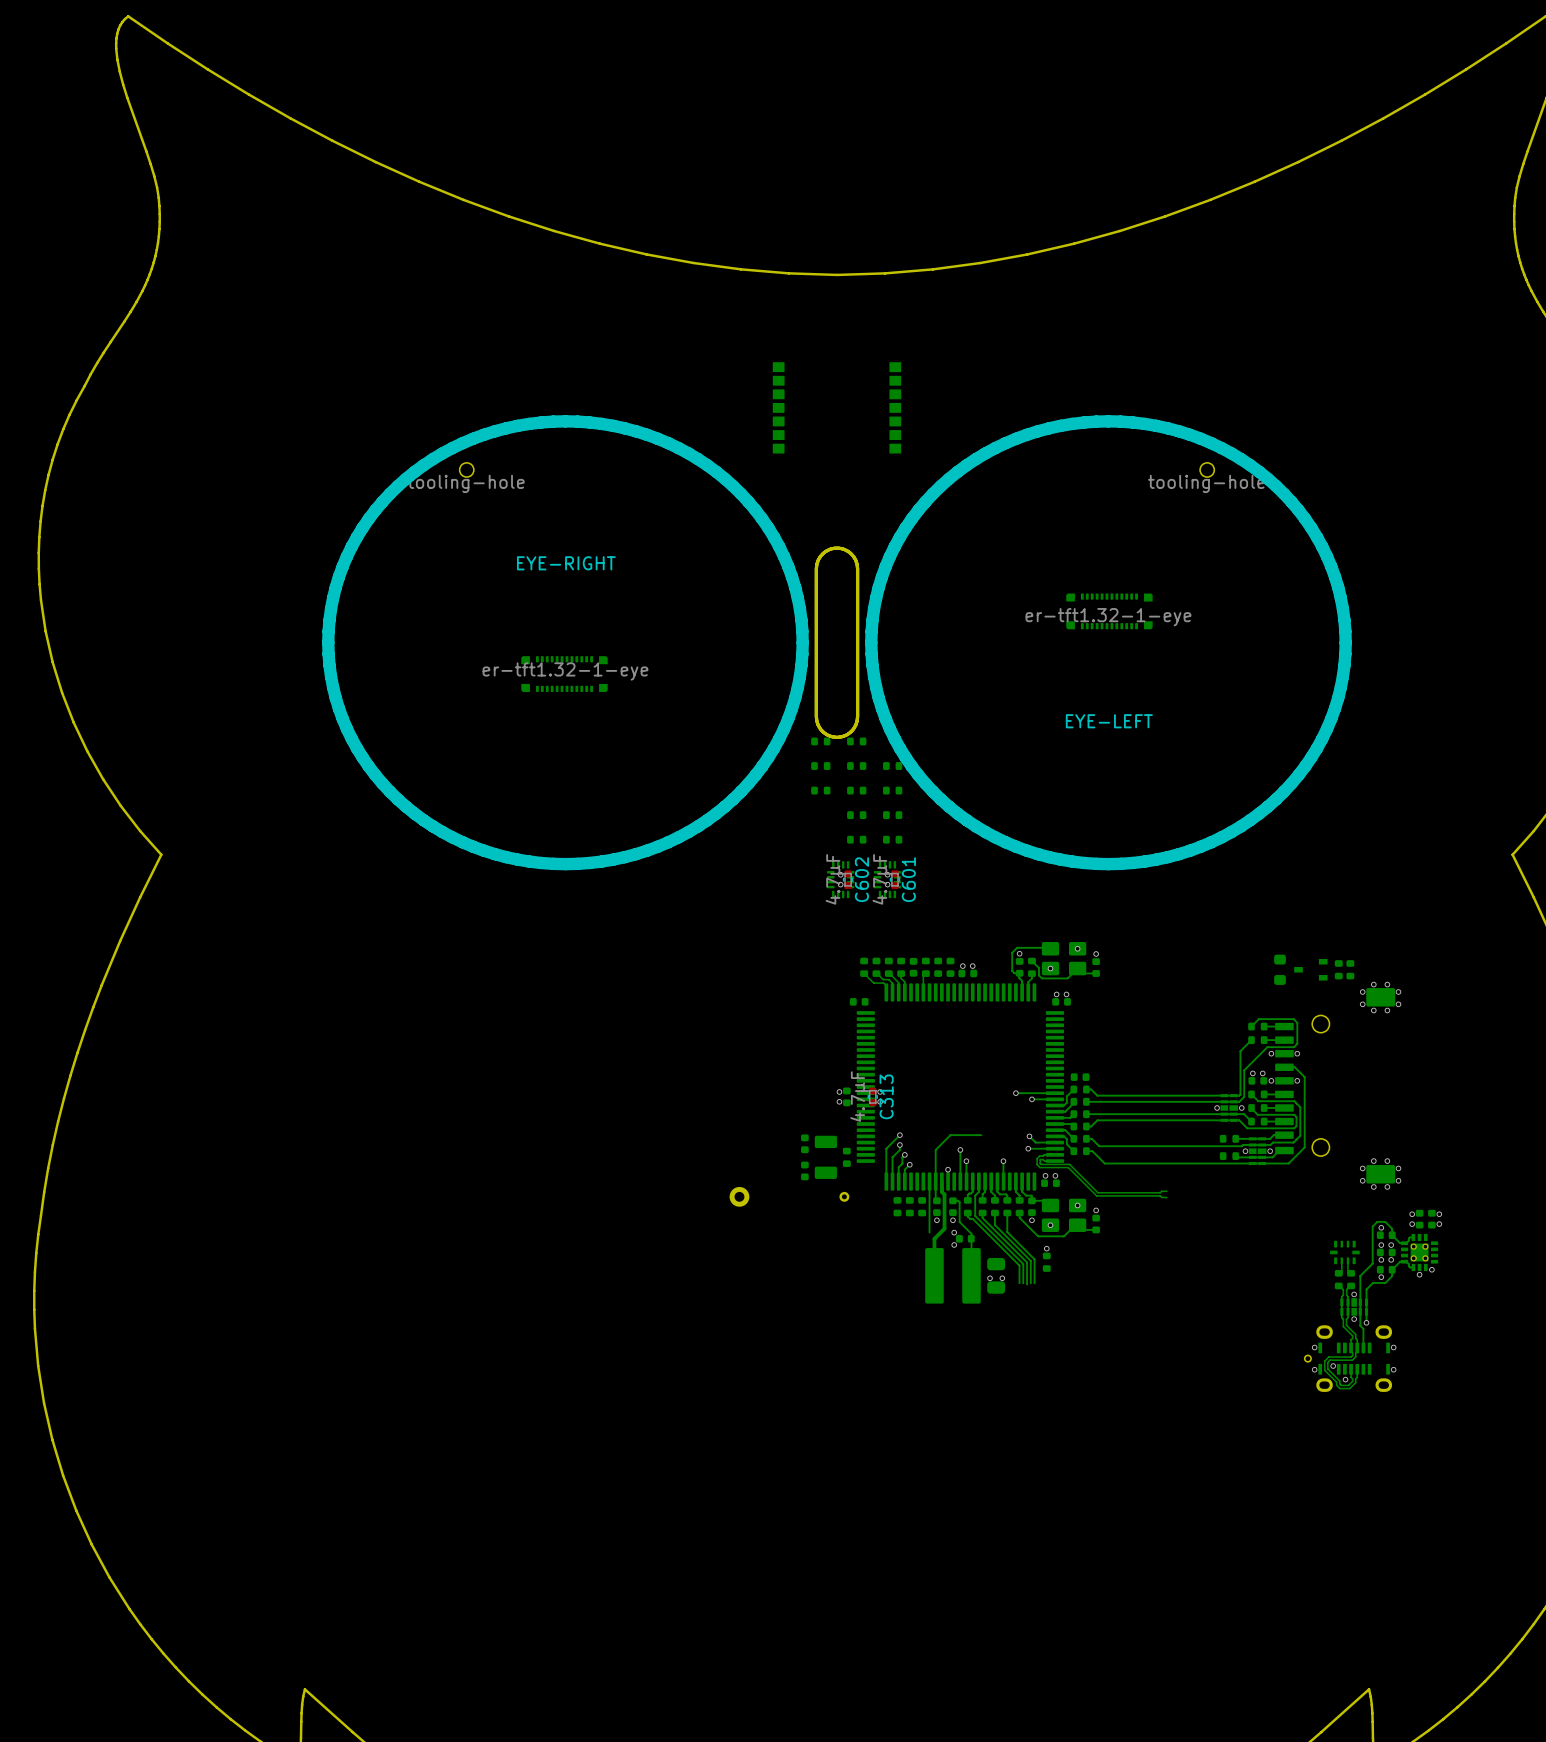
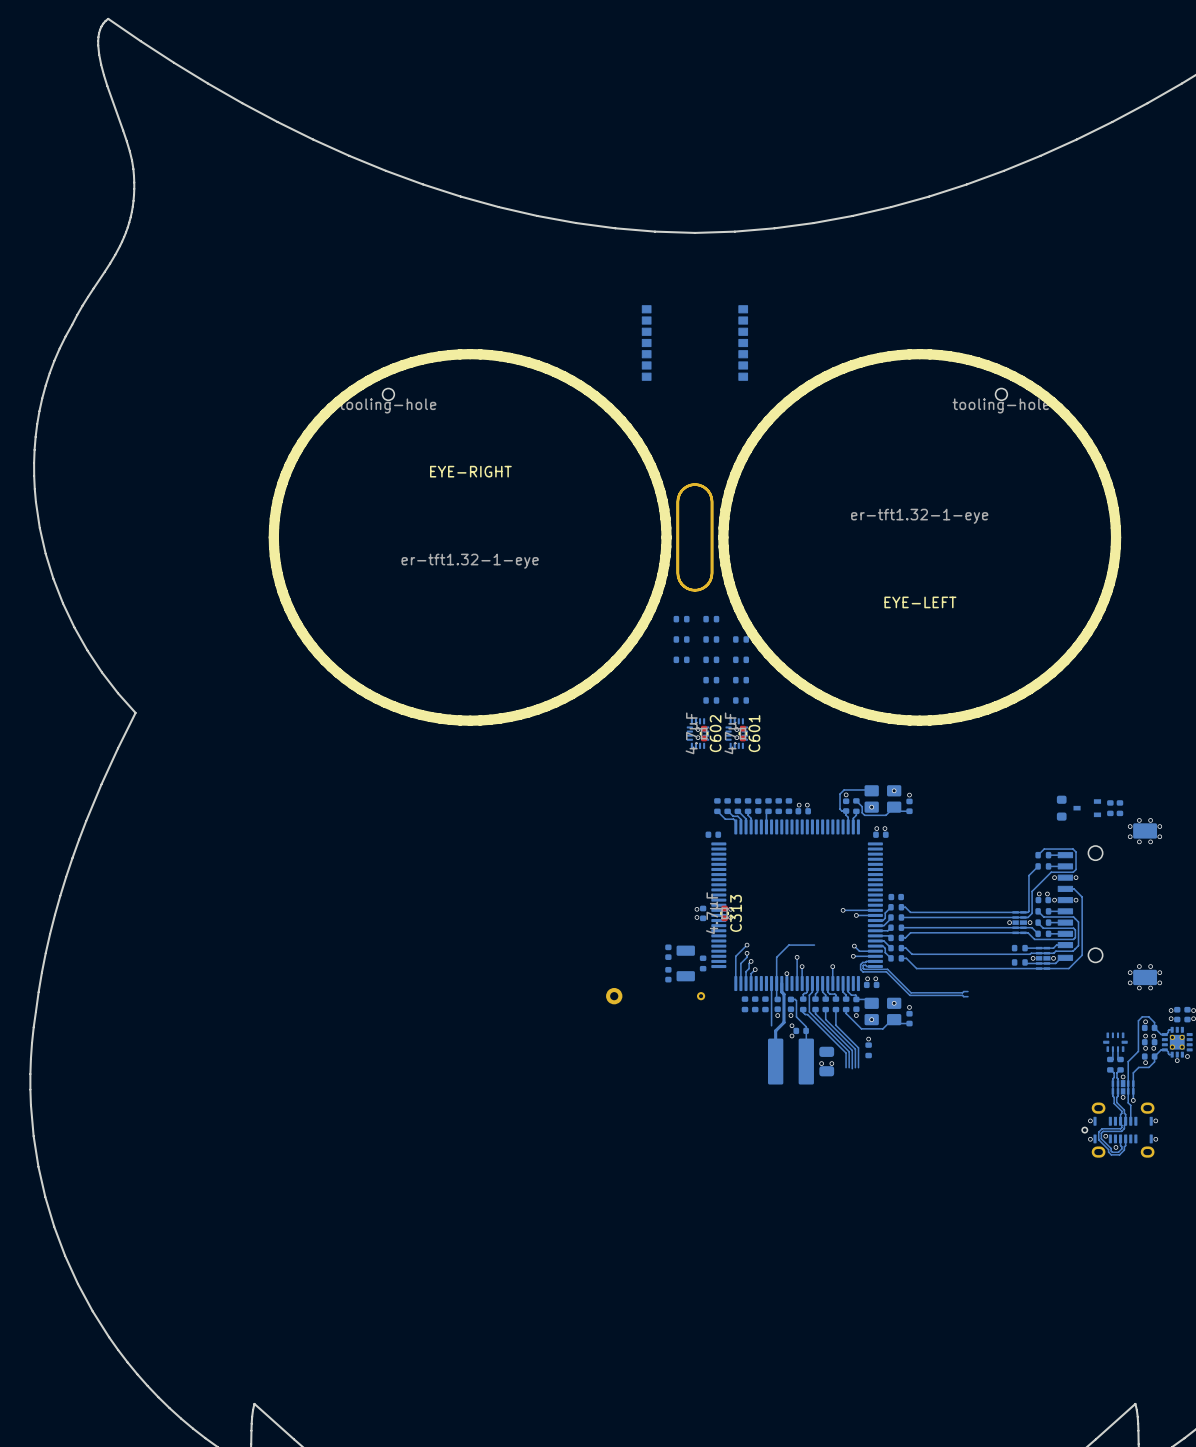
EYE-RIGHT footprint: [322, 415, 860, 871] -> [268, 349, 714, 726]
EYE-LEFT footprint: [814, 415, 1352, 871] -> [676, 349, 1122, 726]
part: (1109, 611) -> none
part: (564, 674) -> none

